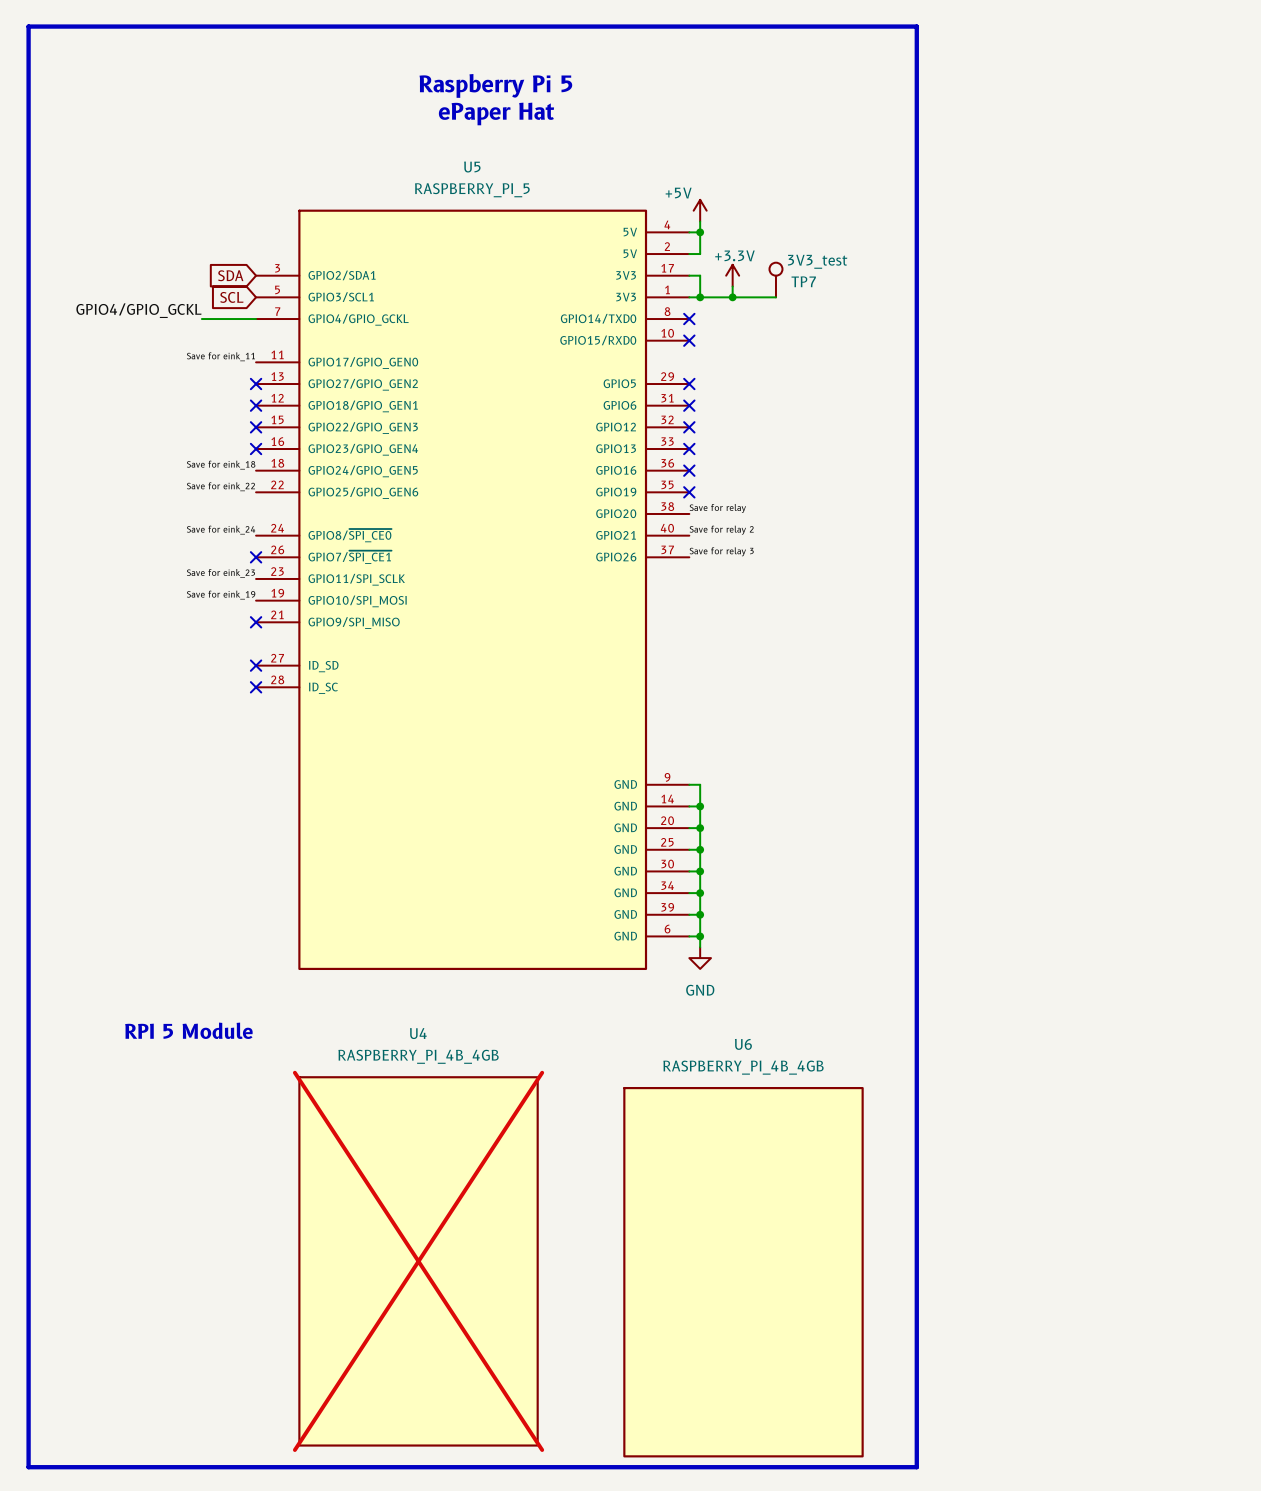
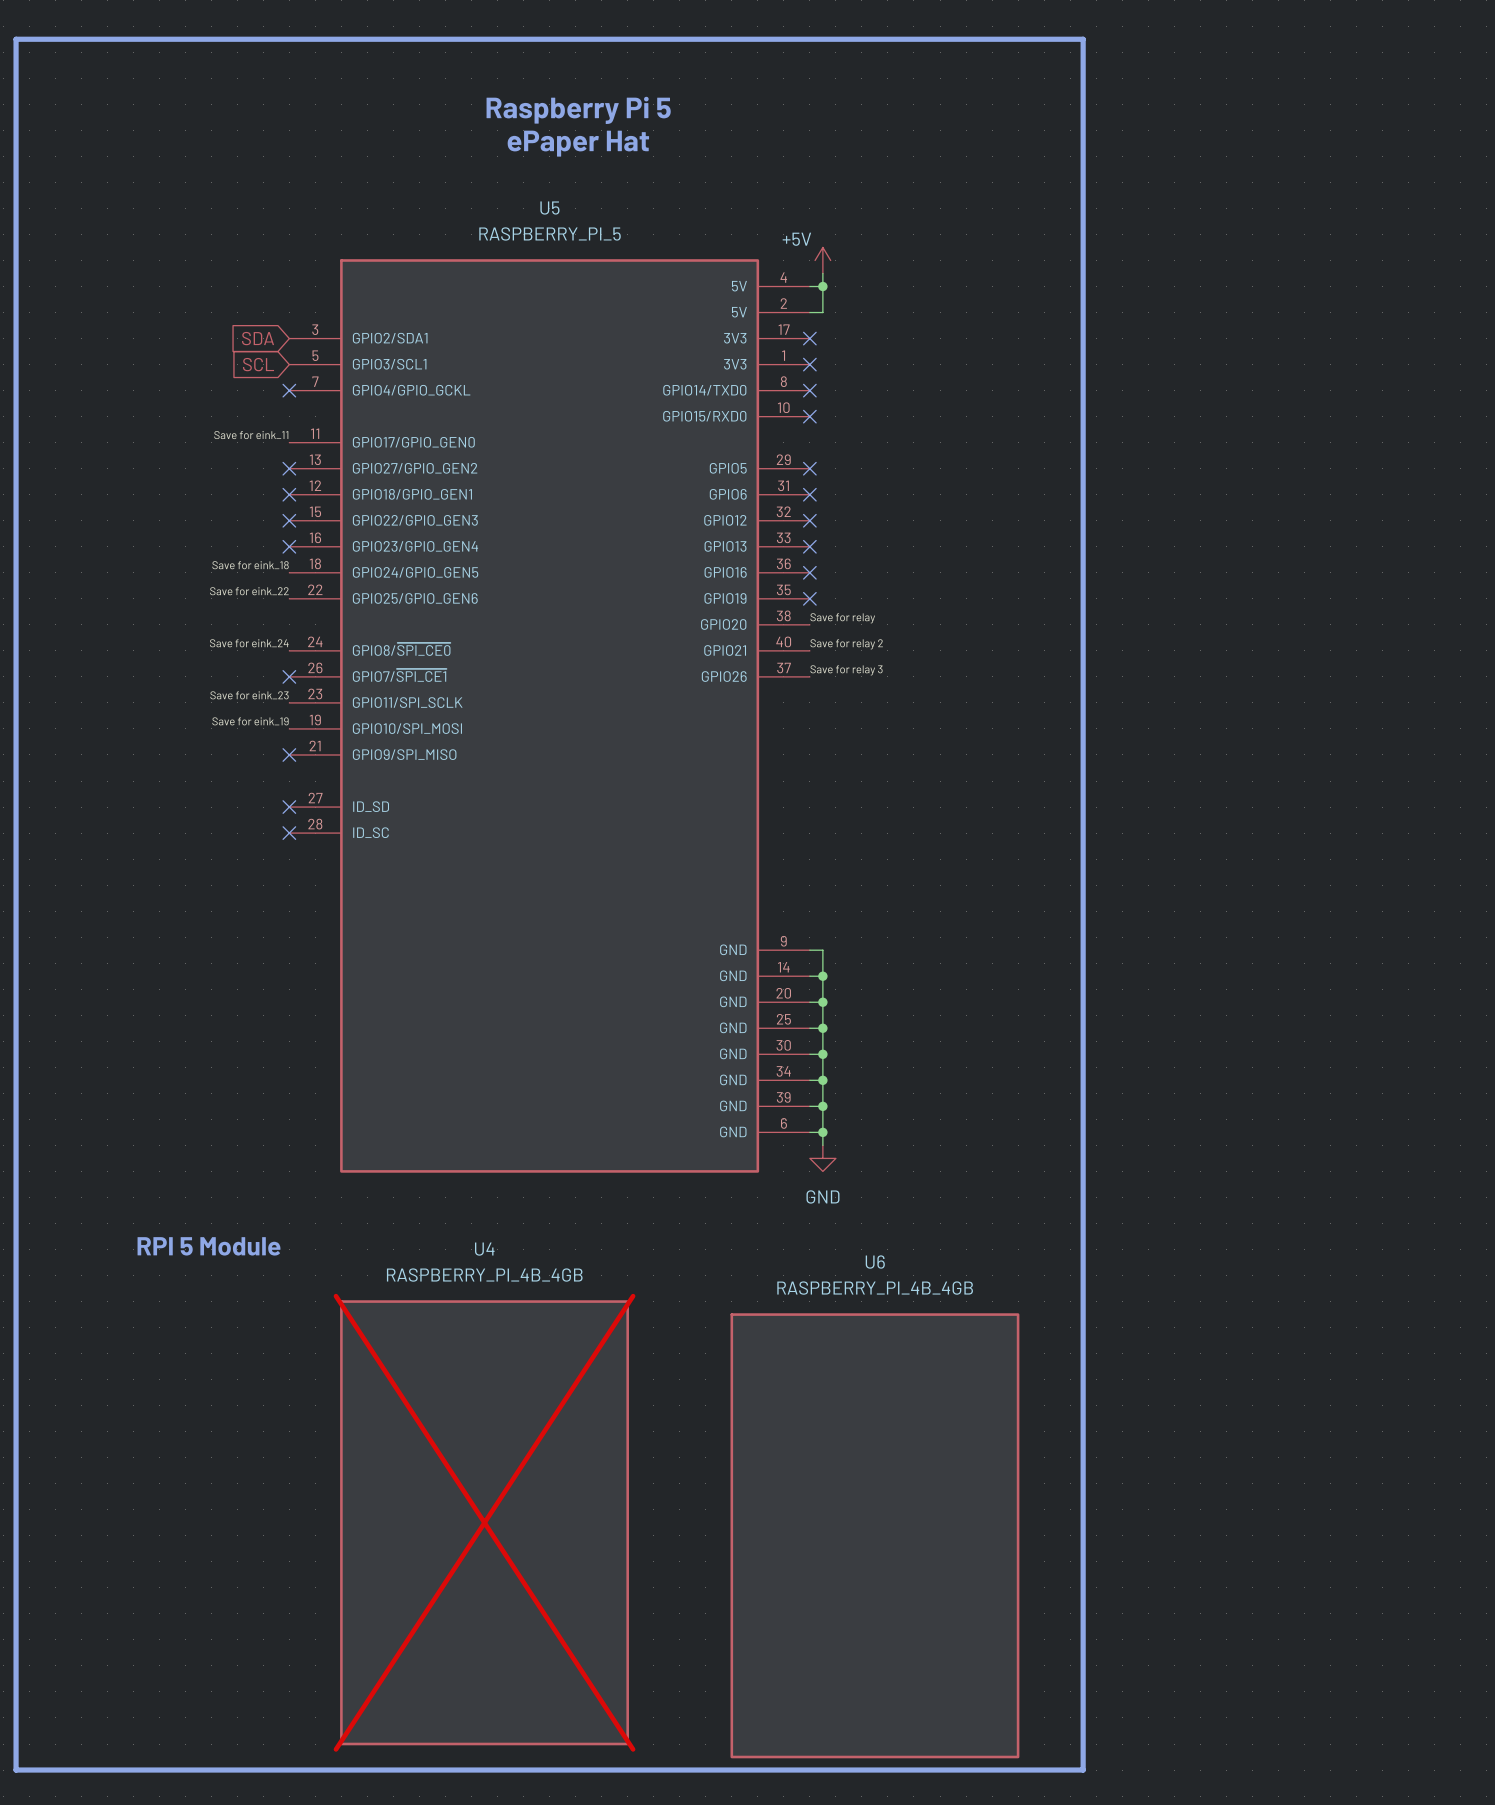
wire: (689, 275) (700, 275) (700, 297) -> none
no-connect mark: none -> (809, 338)
power symbol: +3.3V (732, 275) -> none
TP7: 3V3_test (775, 280) -> none
wire: (732, 286) (732, 297) -> none
wire: (689, 297) (775, 297) -> none
no-connect mark: none -> (809, 364)
junction: (700, 297) -> none
junction: (732, 297) -> none
label: GPIO4/GPIO_GCKL (138, 310) -> none
wire: (201, 319) (256, 319) -> none
no-connect mark: none -> (289, 390)

